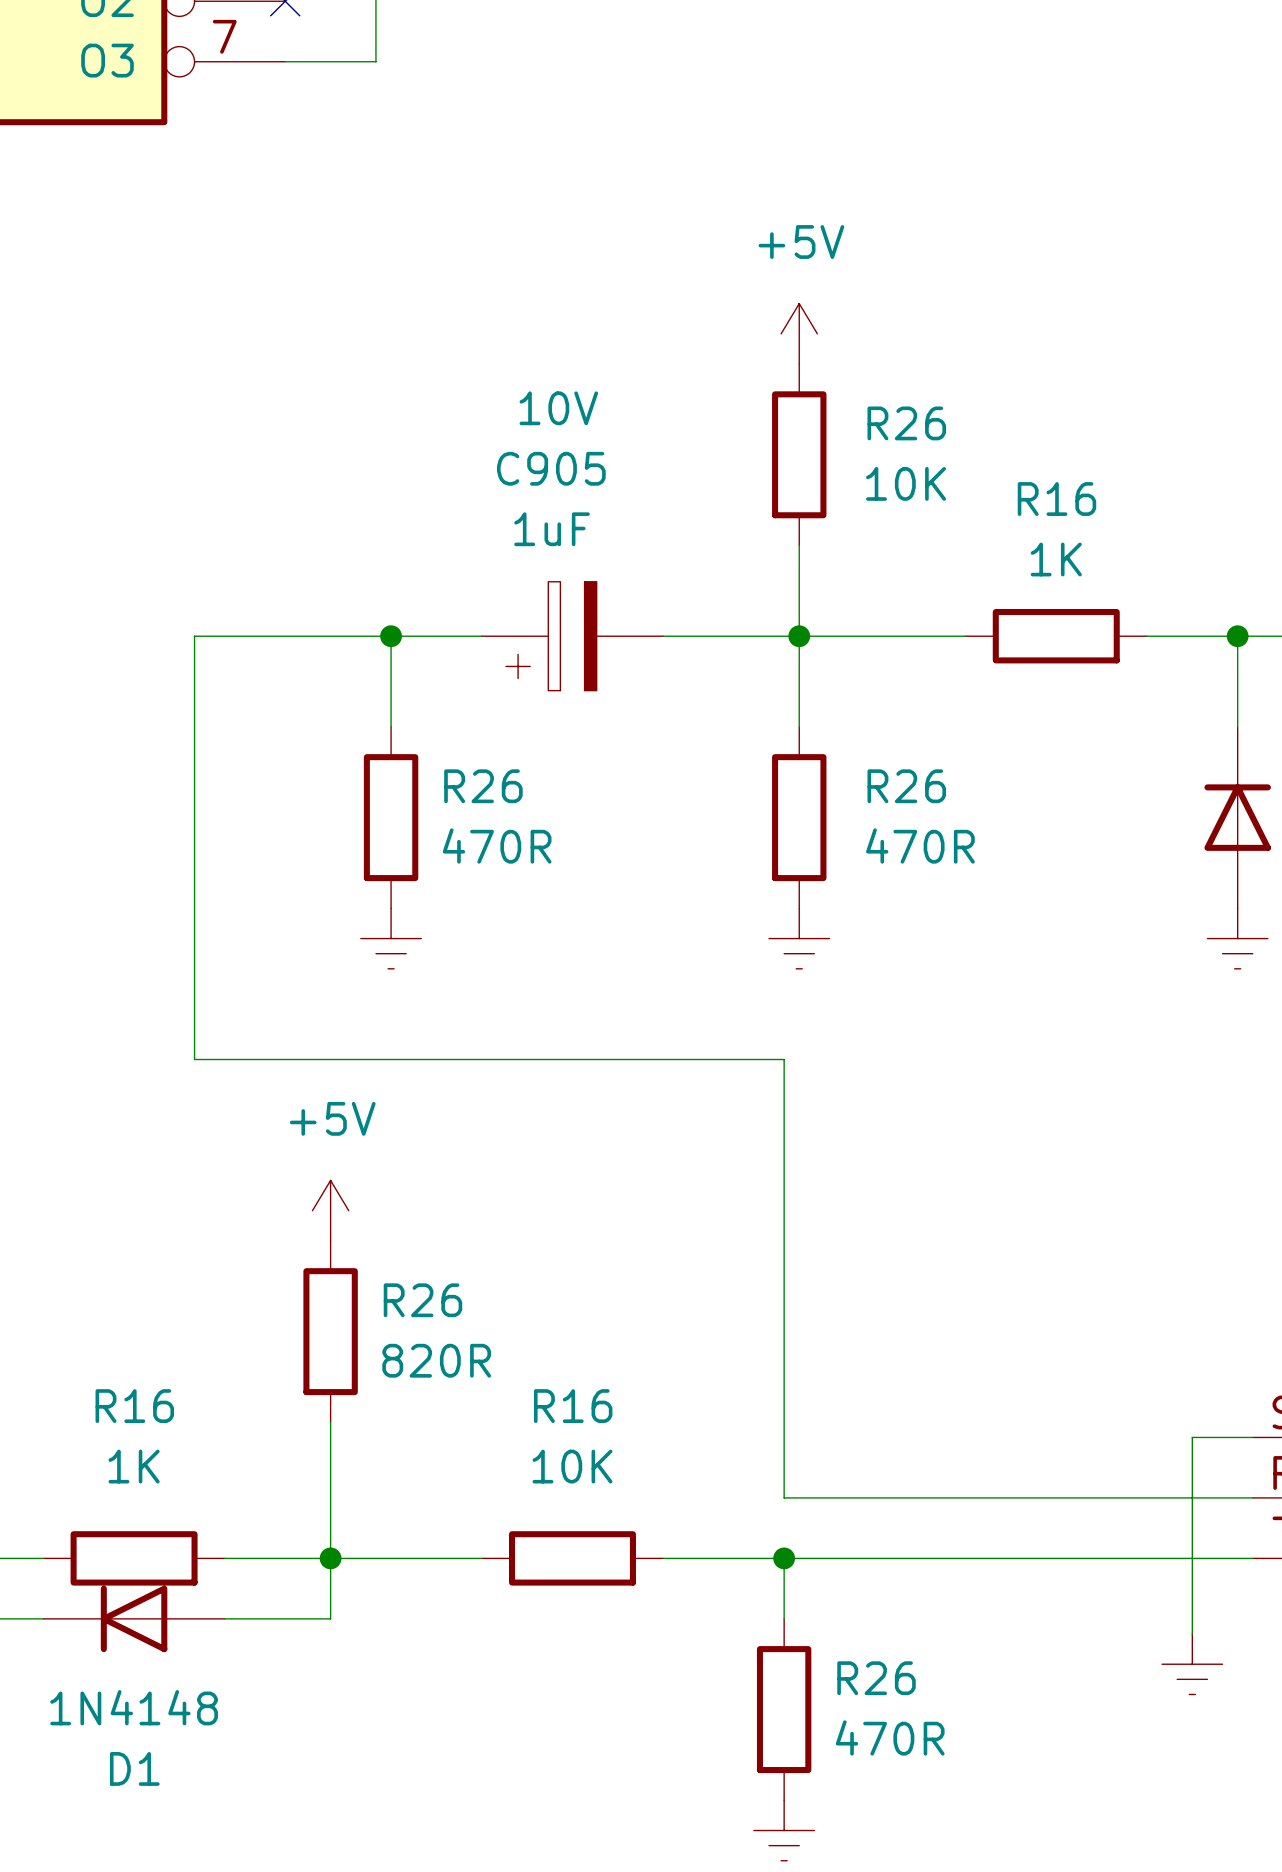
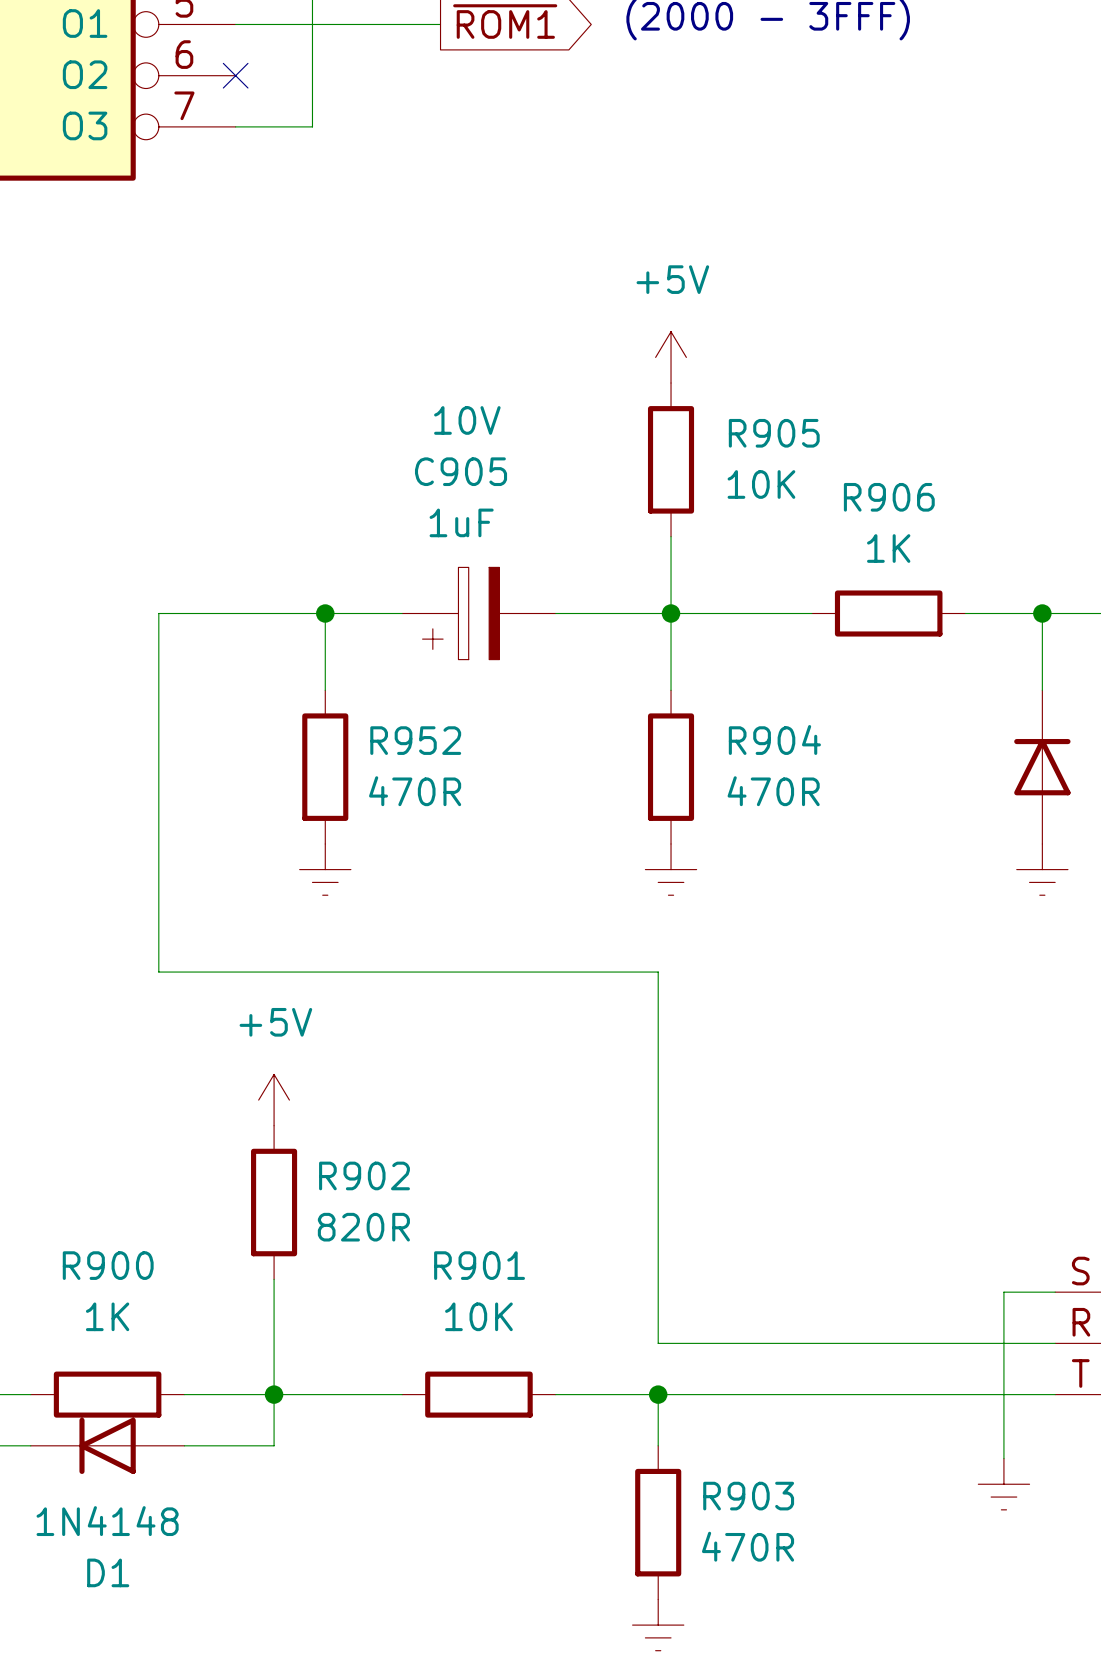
R26 name: R26 (906, 423) -> R905 (774, 433)
R16 name: R16 (1056, 499) -> R906 (889, 497)
R26 name: R26 (483, 786) -> R952 (415, 740)
R26 name: R26 (906, 786) -> R904 (774, 739)
R26 name: R26 (422, 1300) -> R902 (364, 1175)
R16 name: R16 (134, 1406) -> R900 (108, 1265)
R16 name: R16 (573, 1406) -> R901 (479, 1265)
R26 name: R26 (876, 1678) -> R903 (748, 1496)

